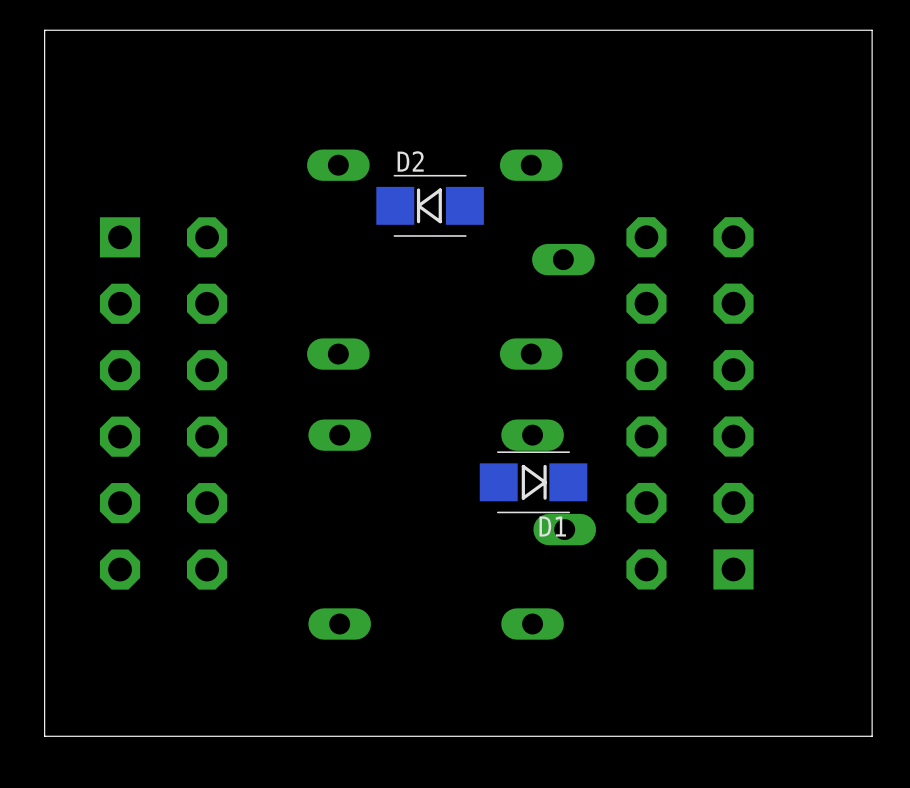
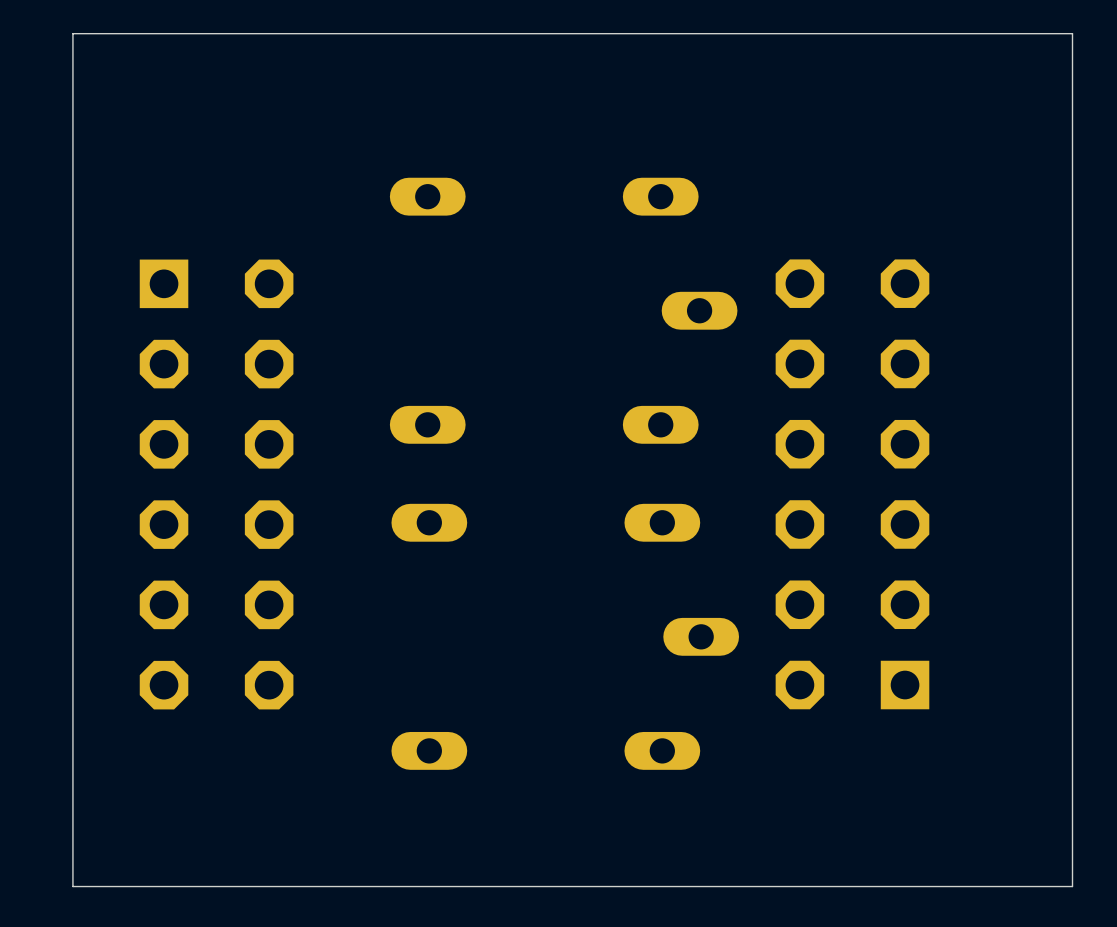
D2: (430, 205) -> none
D1: (533, 482) -> none

